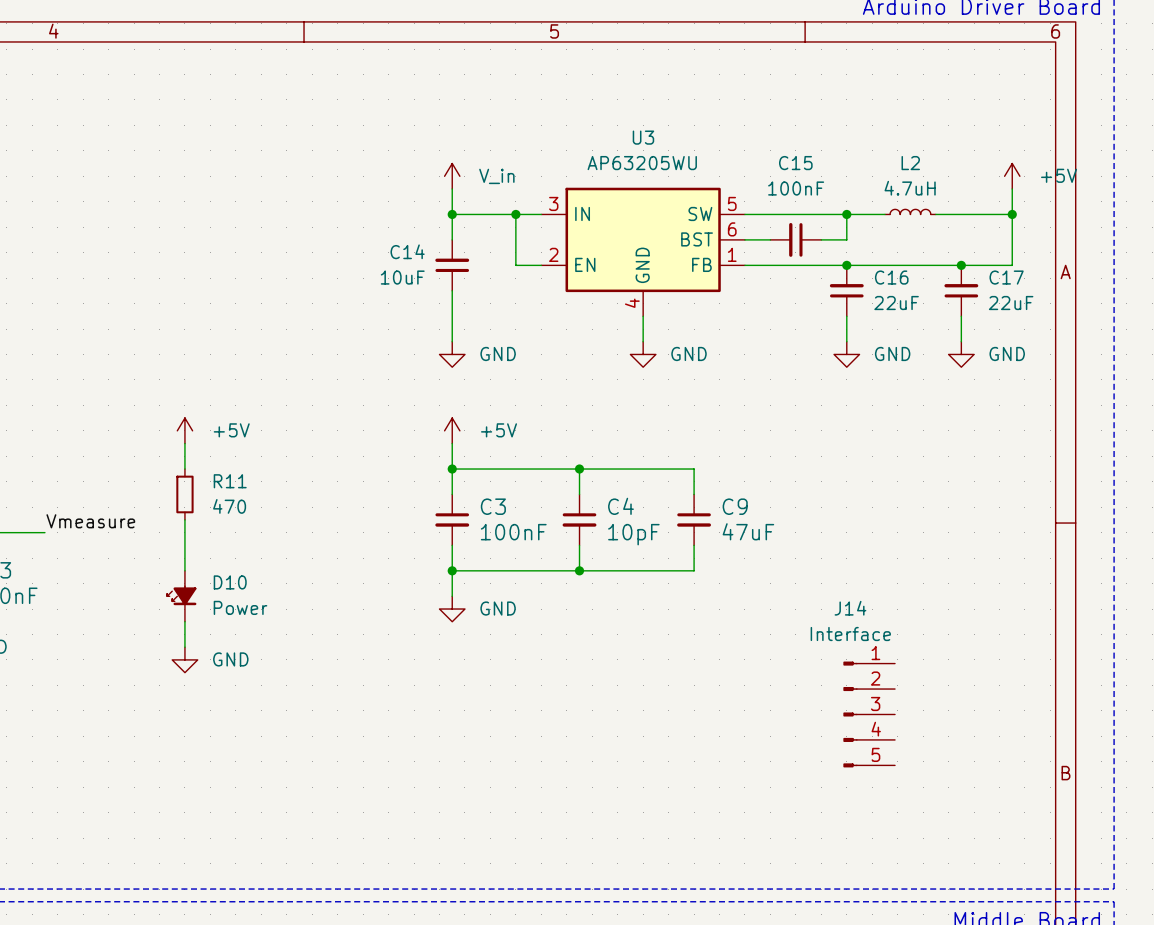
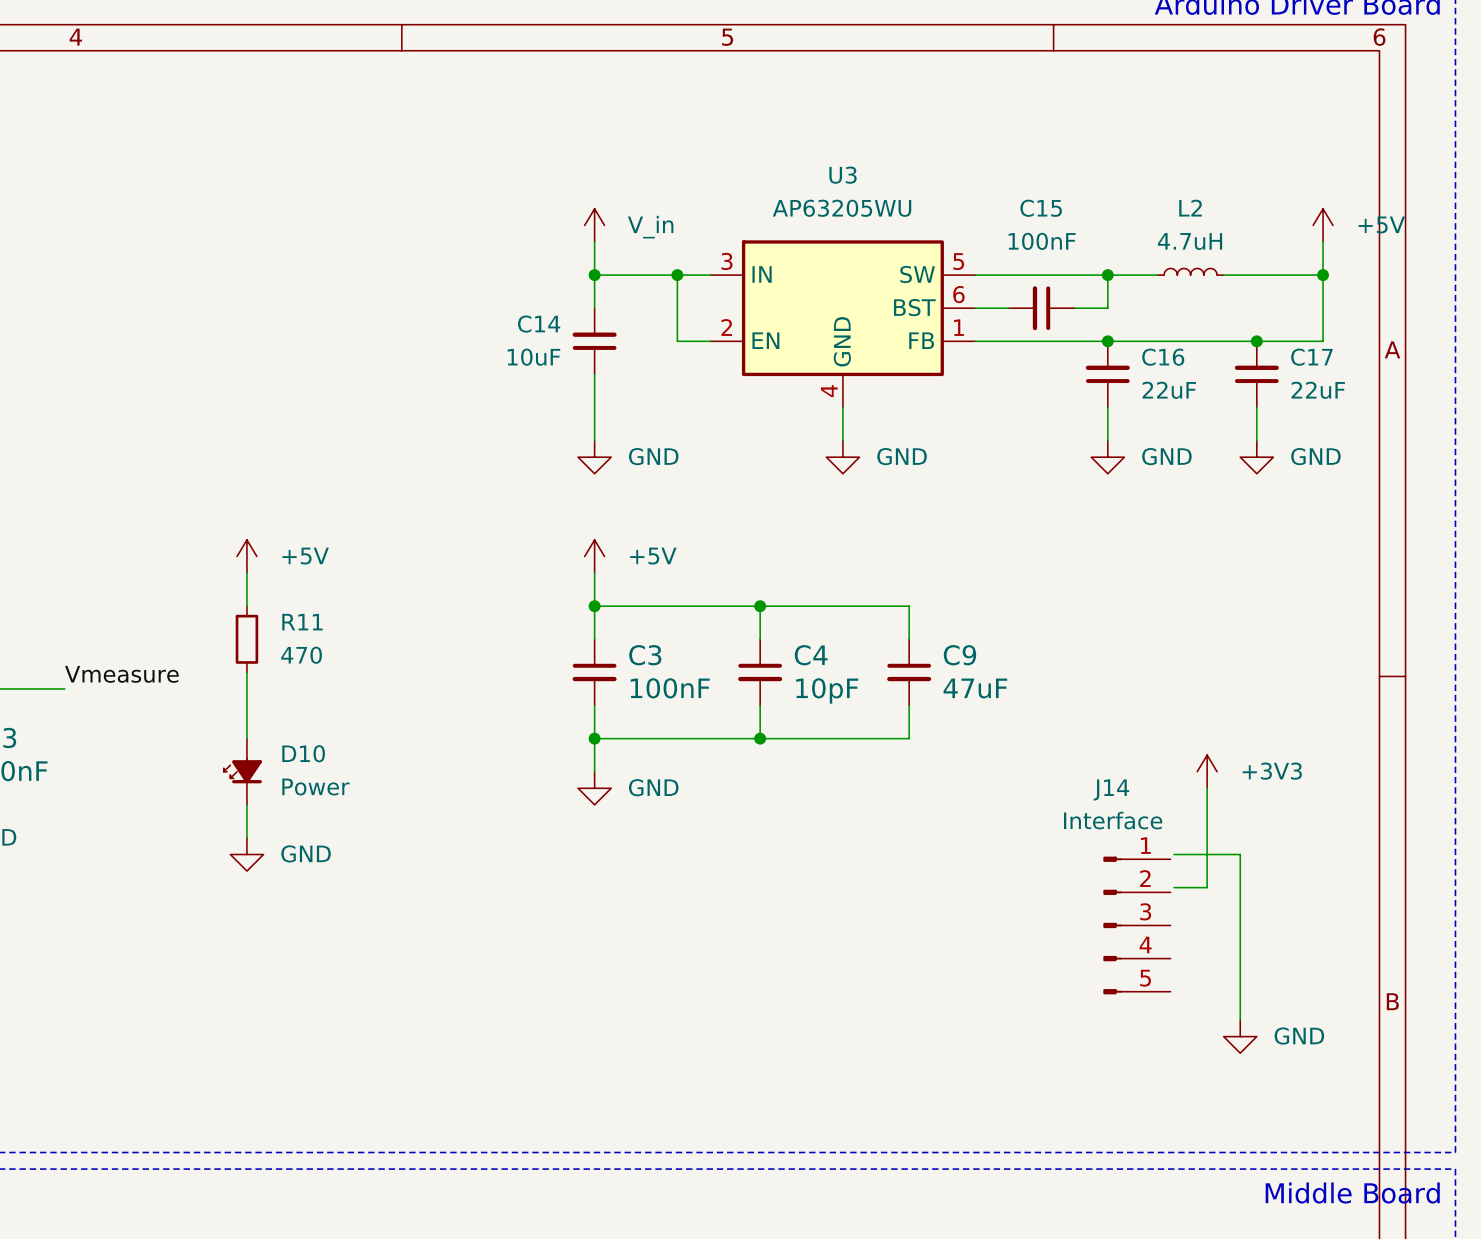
power symbol: none -> +3V3 (1207, 771)
wire: none -> (1207, 788) (1207, 887) (1174, 887)
wire: none -> (1174, 854) (1240, 854) (1240, 1020)
power symbol: none -> GND (1240, 1036)

